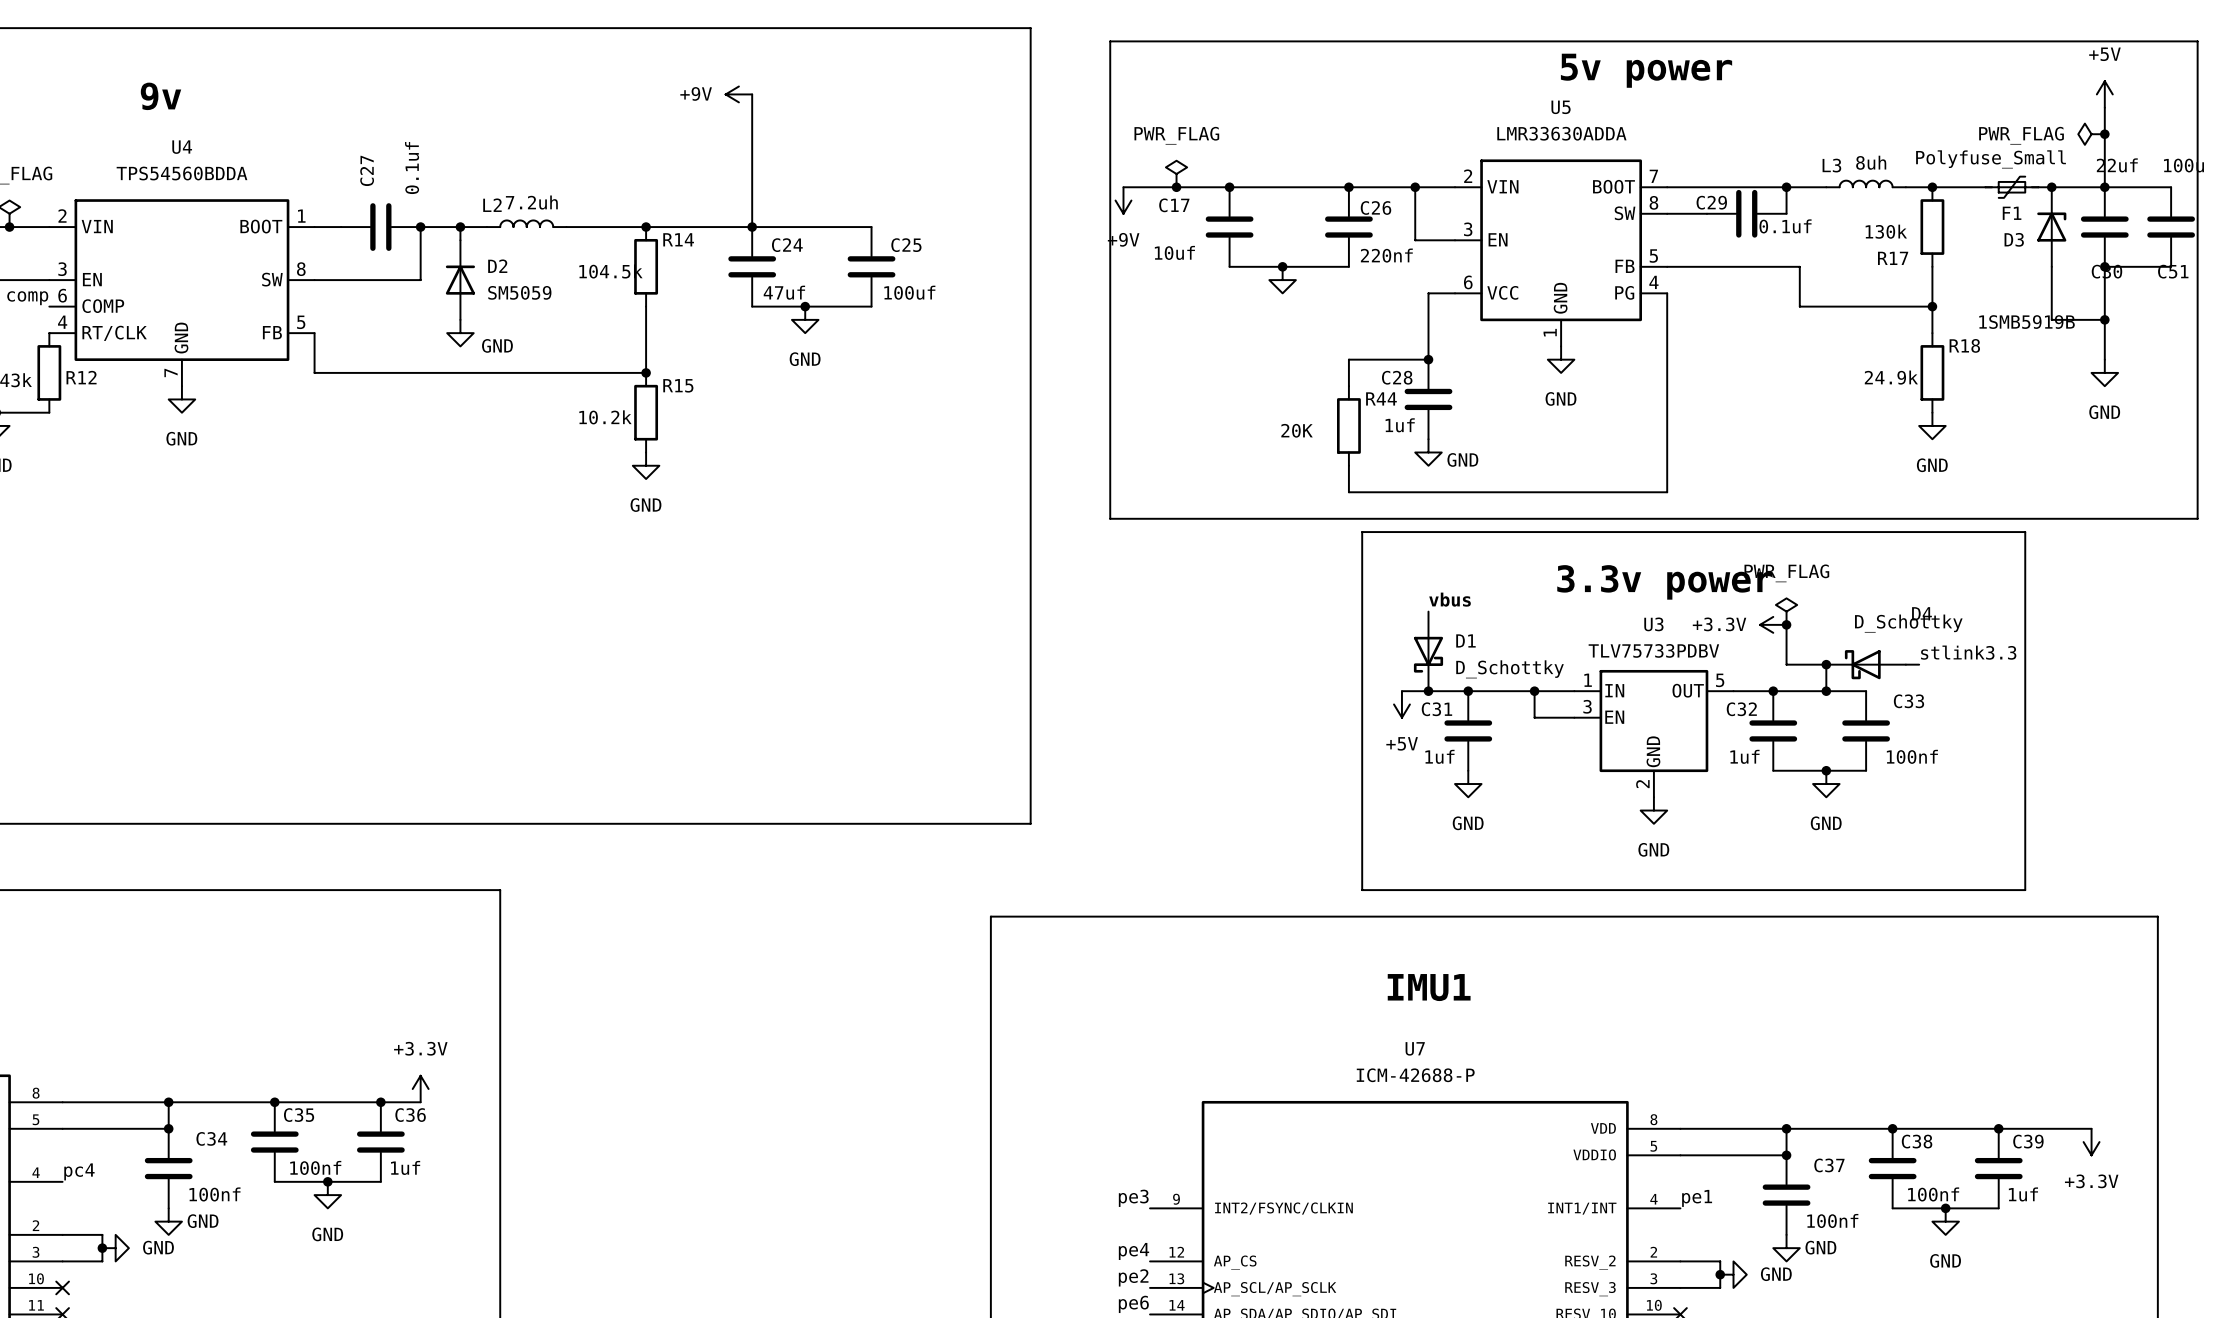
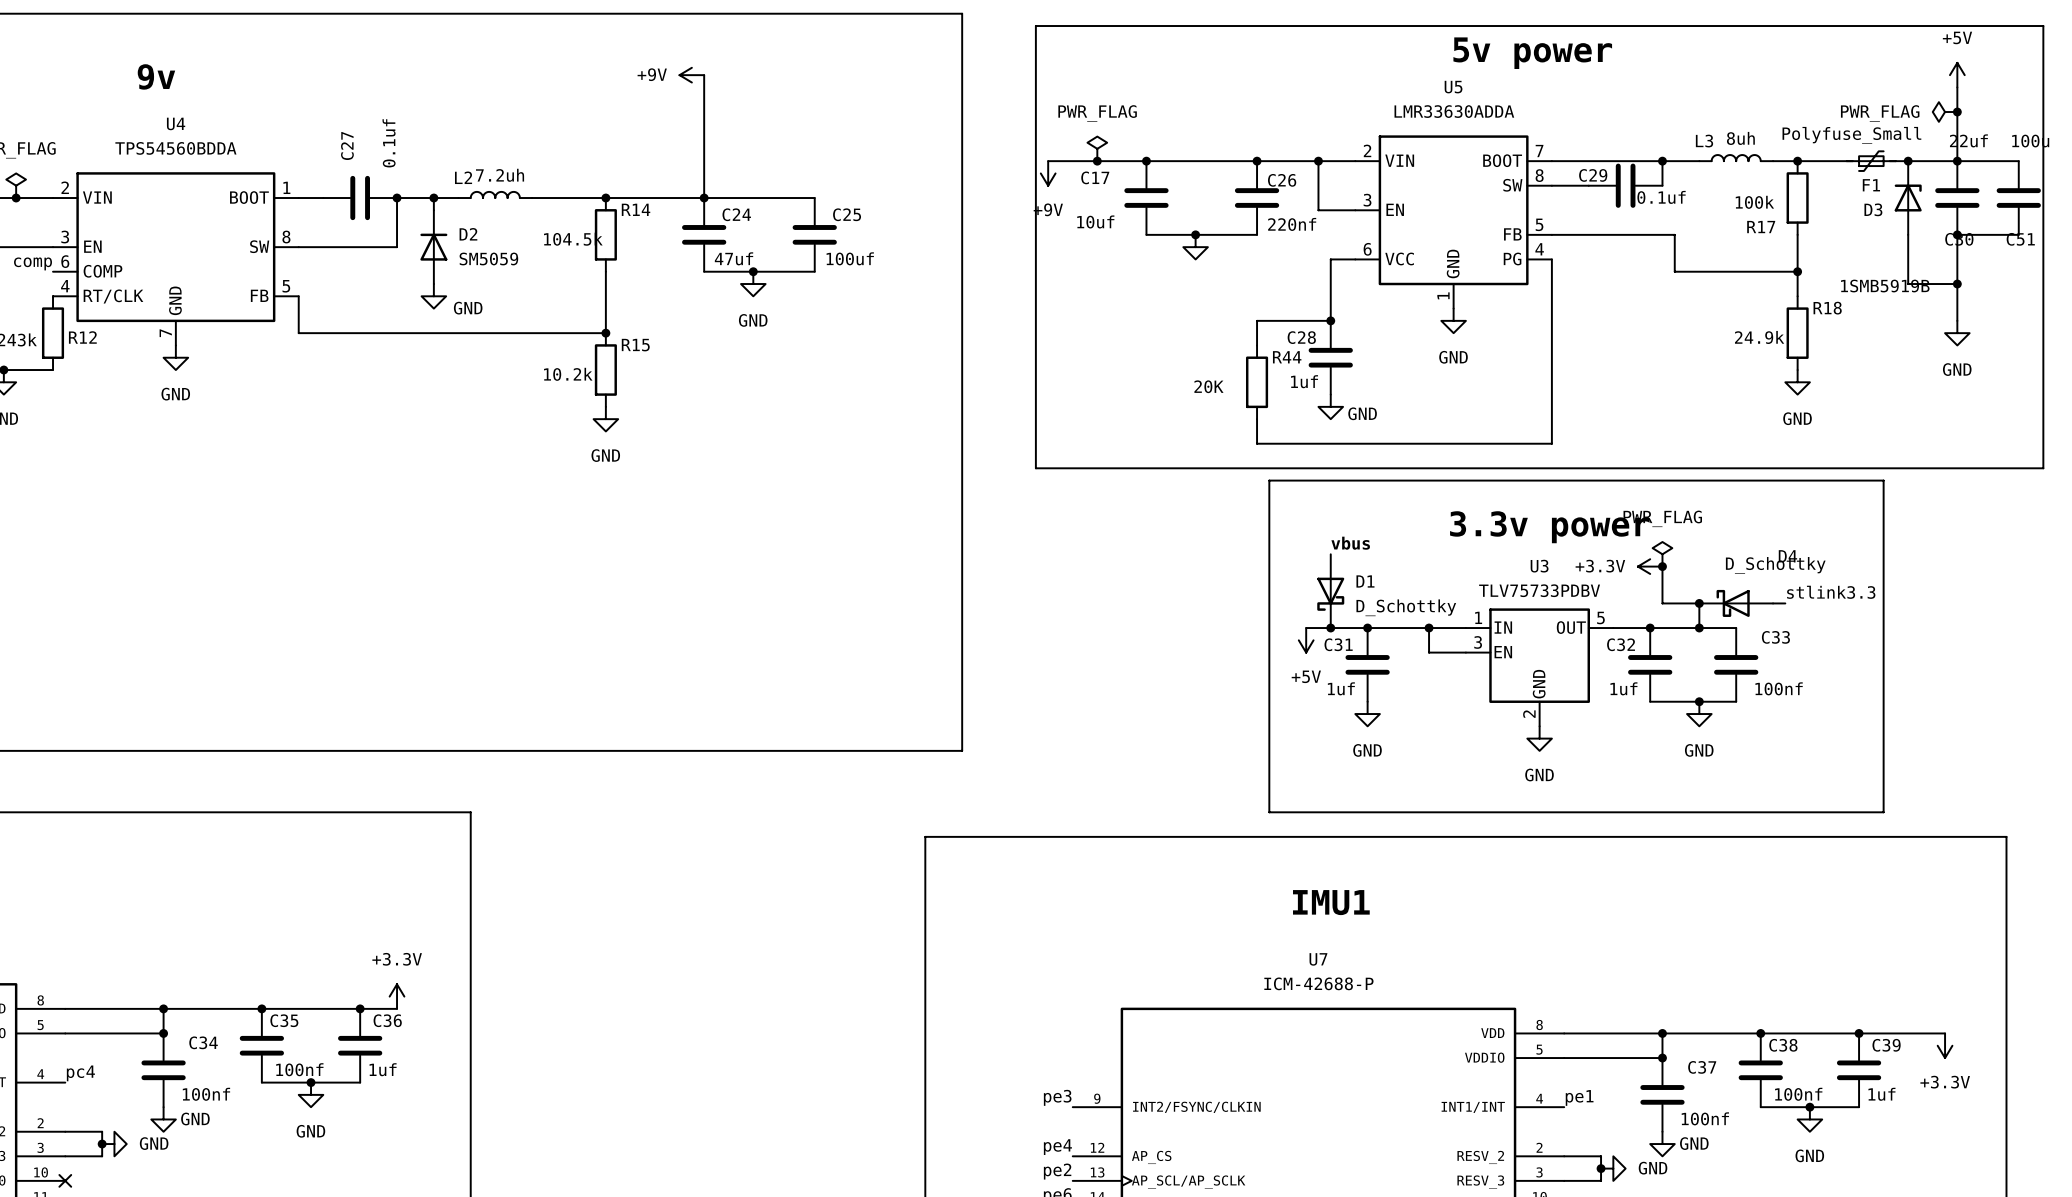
R17 value: 130k (1886, 231) -> 100k (1754, 202)

